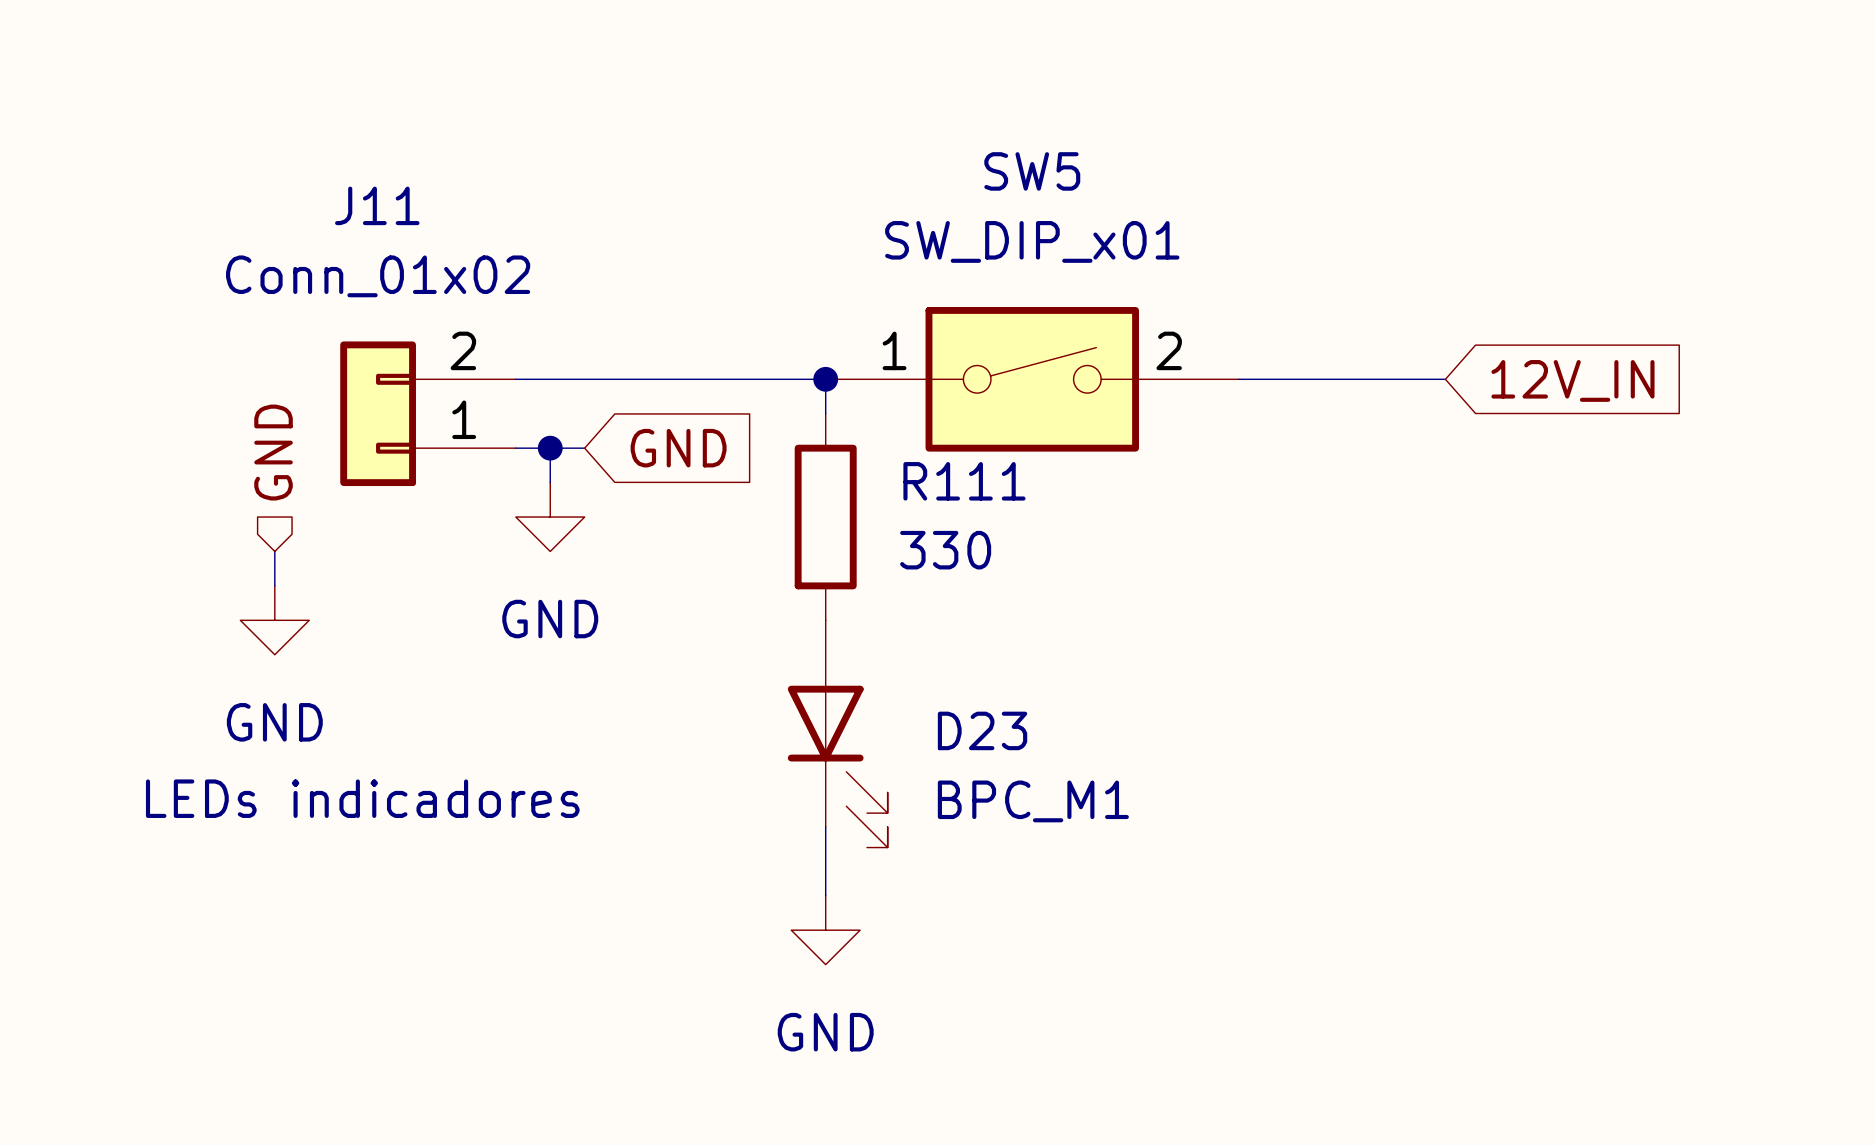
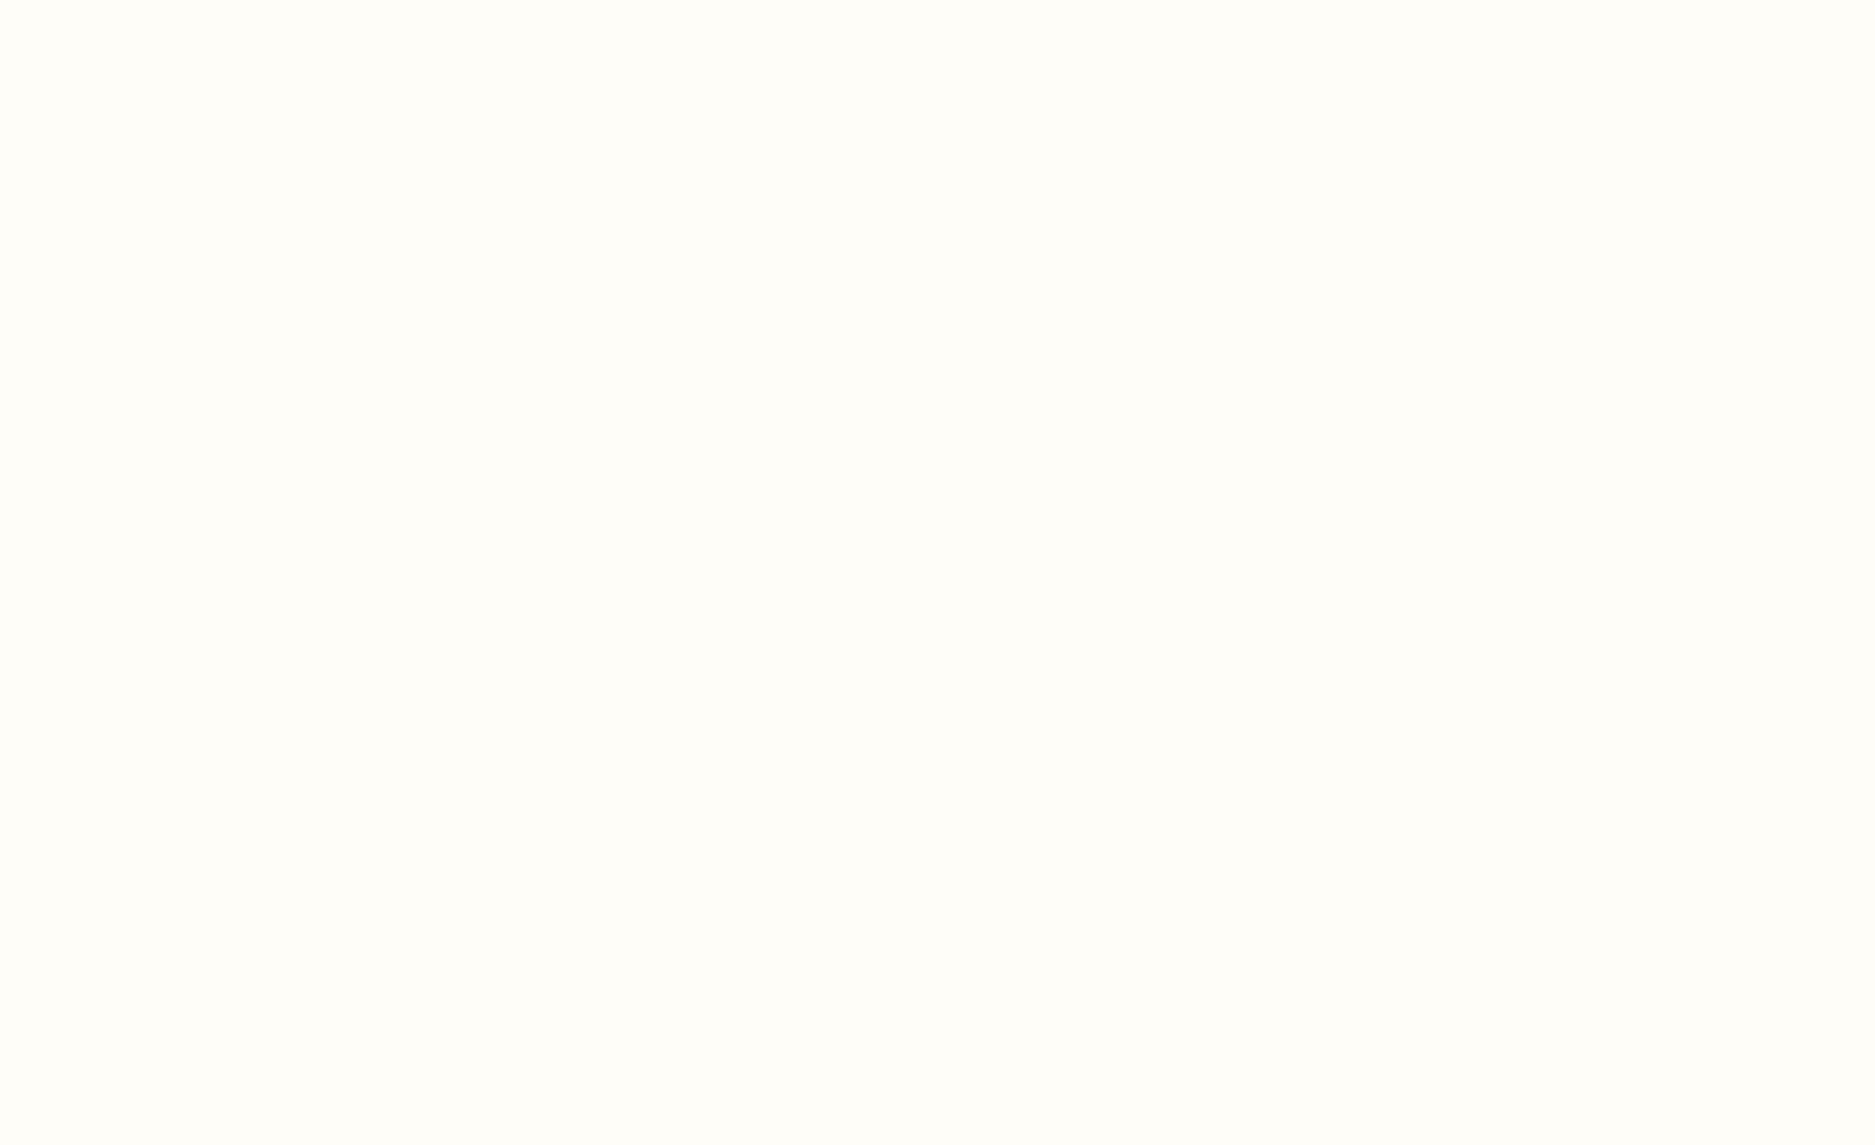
wire: (515, 379) (825, 379) (825, 413) -> none
junction: (825, 379) -> none
SW5: SW_DIP_x01 (1032, 379) -> none
wire: (1238, 379) (1445, 379) -> none
global label: 12V_IN (1572, 380) -> none
J11: Conn_01x02 (428, 413) -> none
wire: (515, 448) (584, 448) -> none
wire: (550, 448) (550, 482) -> none
junction: (550, 448) -> none
global label: GND (678, 448) -> none
hierarchical label: GND (273, 452) -> none
power symbol: GND (550, 517) -> none
R111: 330 (825, 517) -> none
wire: (274, 551) (274, 585) -> none
power symbol: GND (274, 620) -> none
D23: BPC_M1 (837, 733) -> none
text: LEDs indicadores (362, 798) -> none
wire: (825, 826) (825, 895) -> none
power symbol: GND (825, 930) -> none

